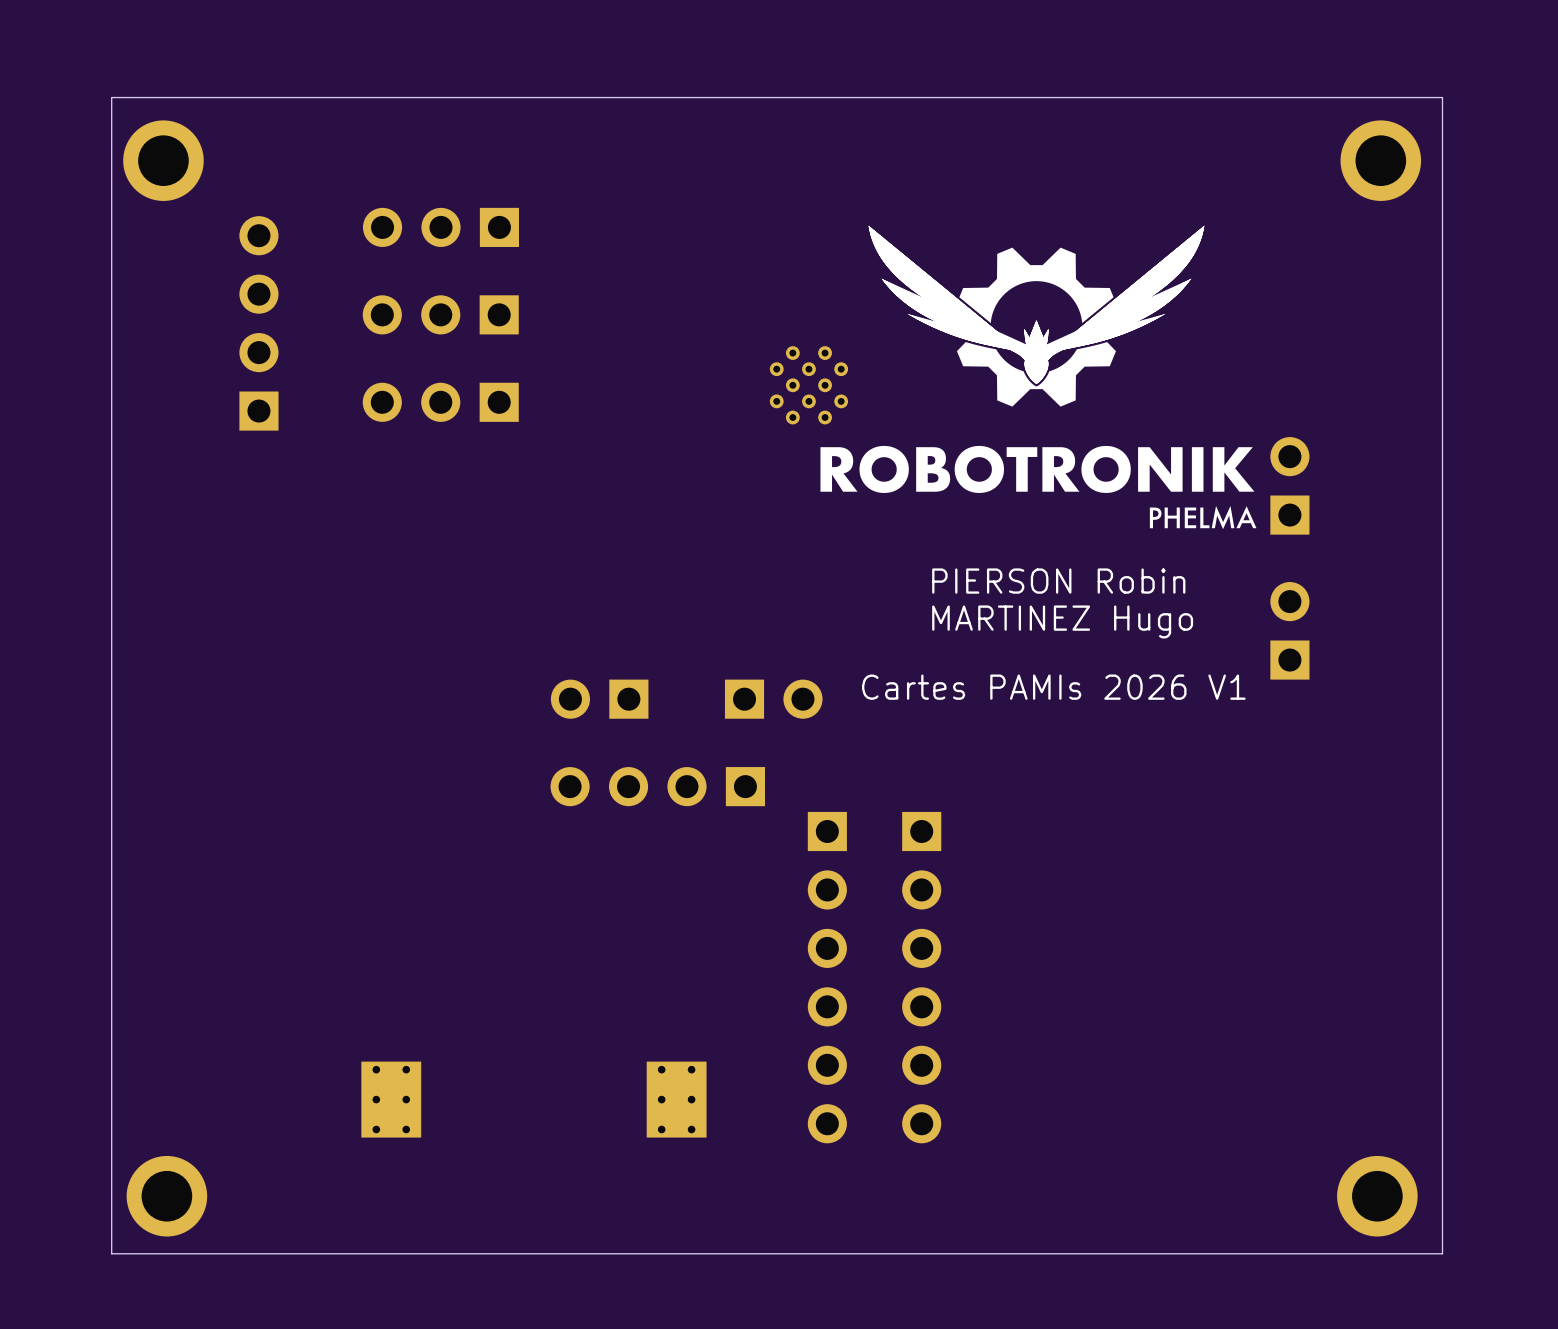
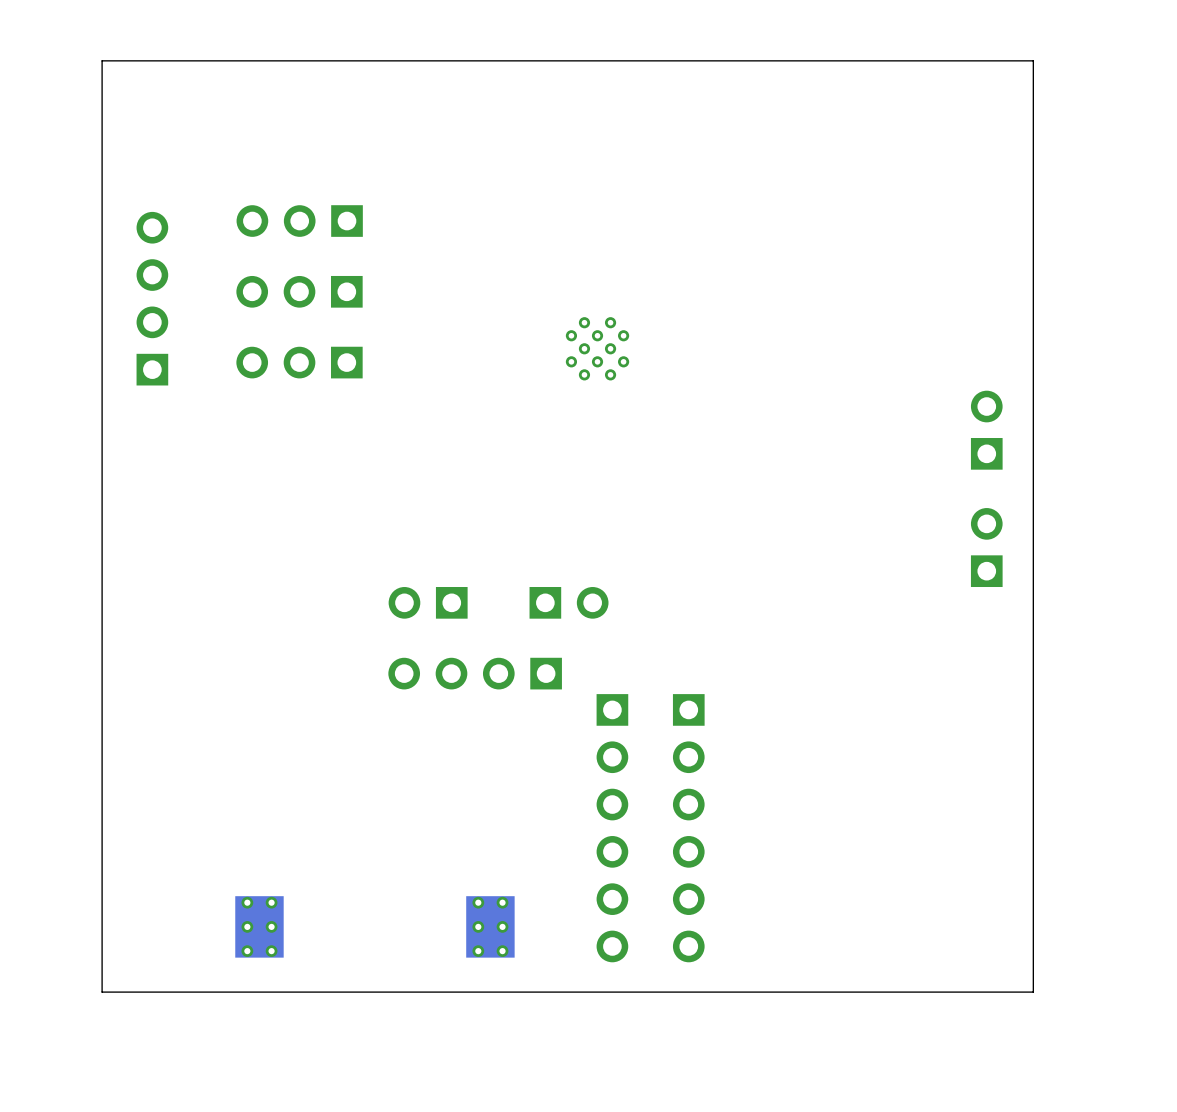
board edge: (1442, 97) (111, 97) (111, 1253) (1442, 1253) (1442, 97) -> (1033, 60) (1033, 992) (102, 992) (102, 60) (1033, 60)
part: (163, 160) -> none
part: (1380, 160) -> none
drawing: [868, 225, 1205, 407] -> none
drawing: [820, 445, 1257, 530] -> none
text: PIERSON Robin (1058, 581) -> none
text: MARTINEZ Hugo (1062, 621) -> none
text: Cartes PAMIs 2026 V1 (1053, 687) -> none
part: (166, 1196) -> none
part: (1377, 1196) -> none

